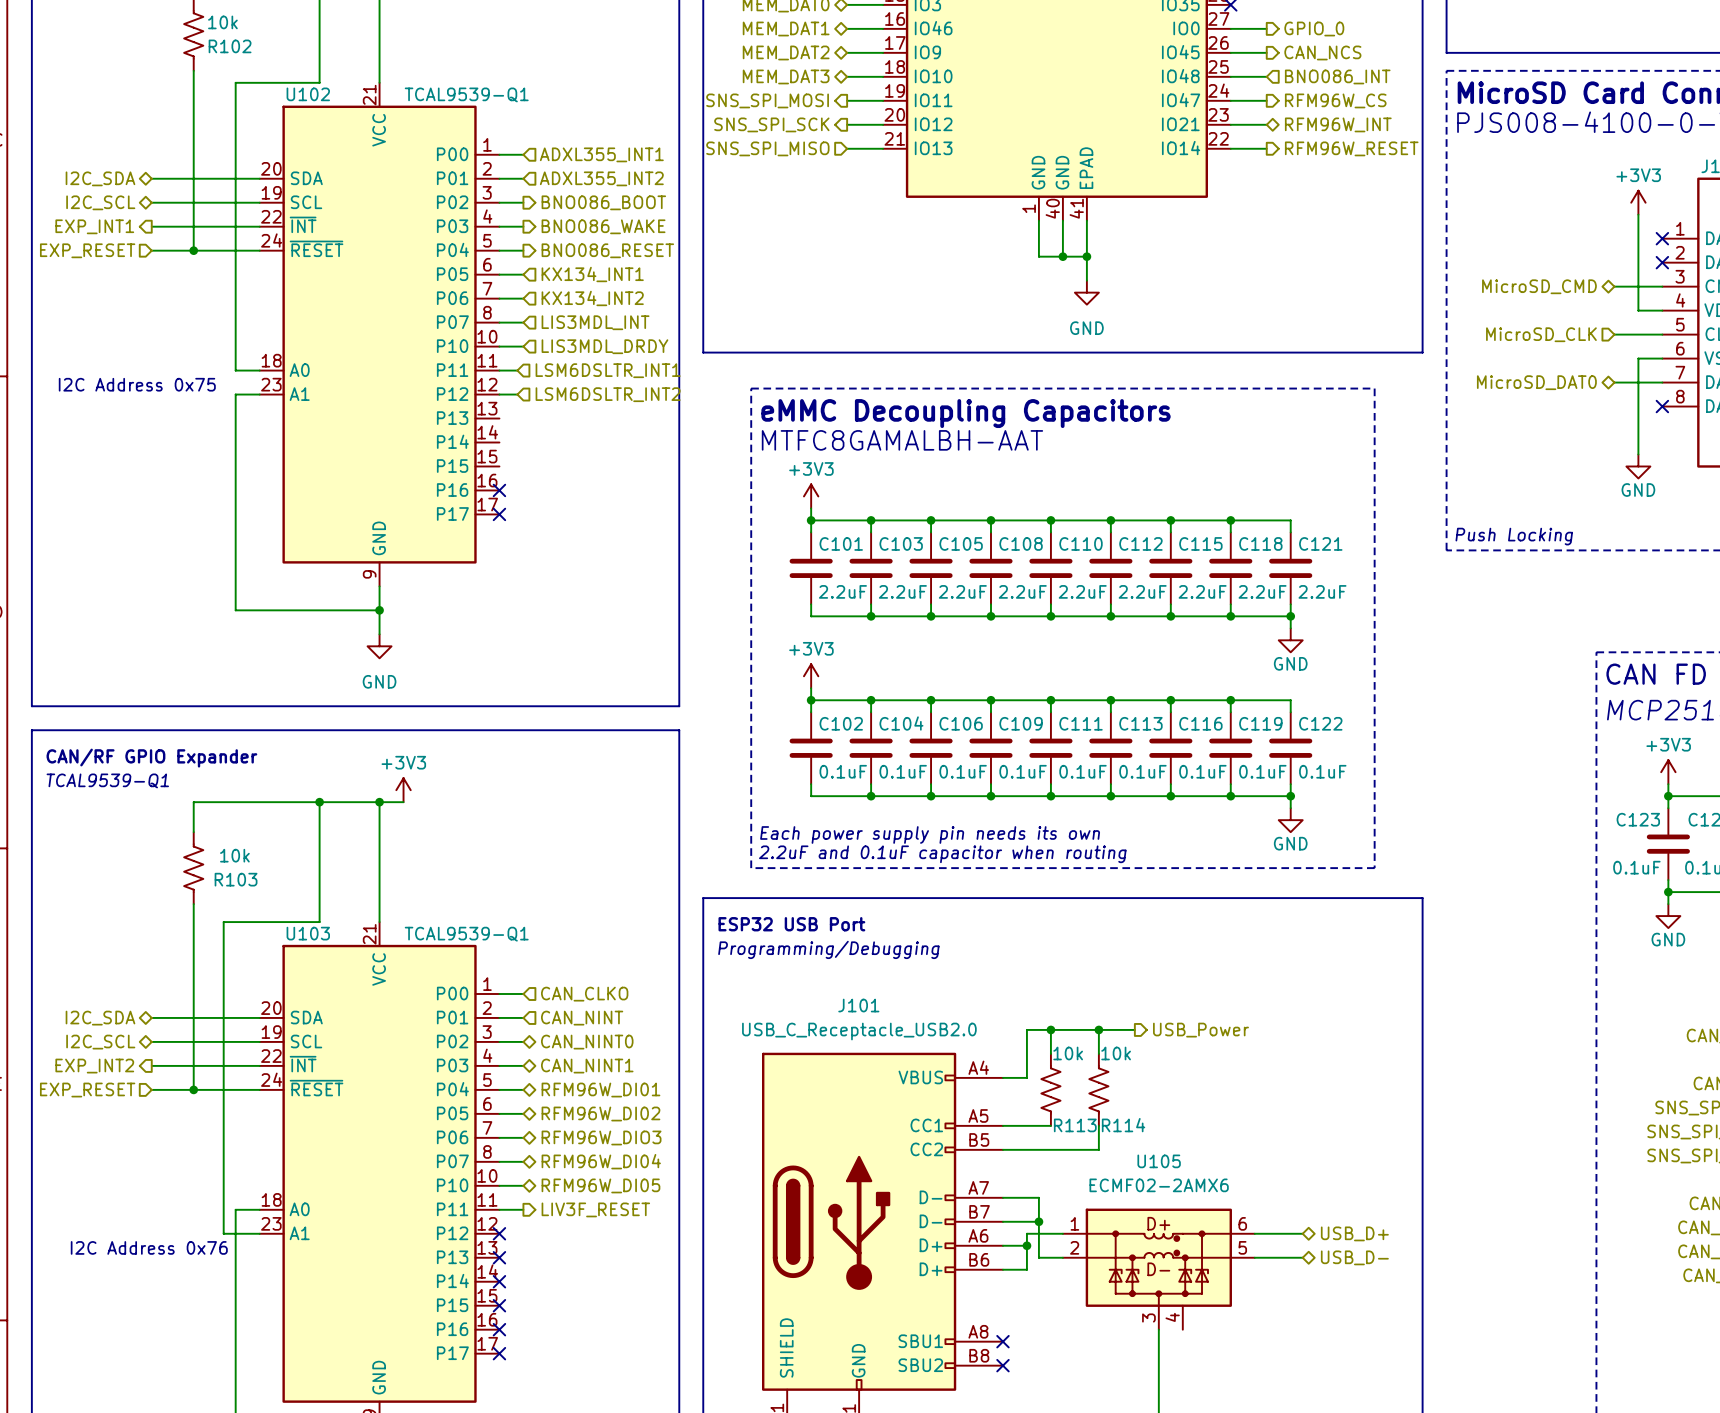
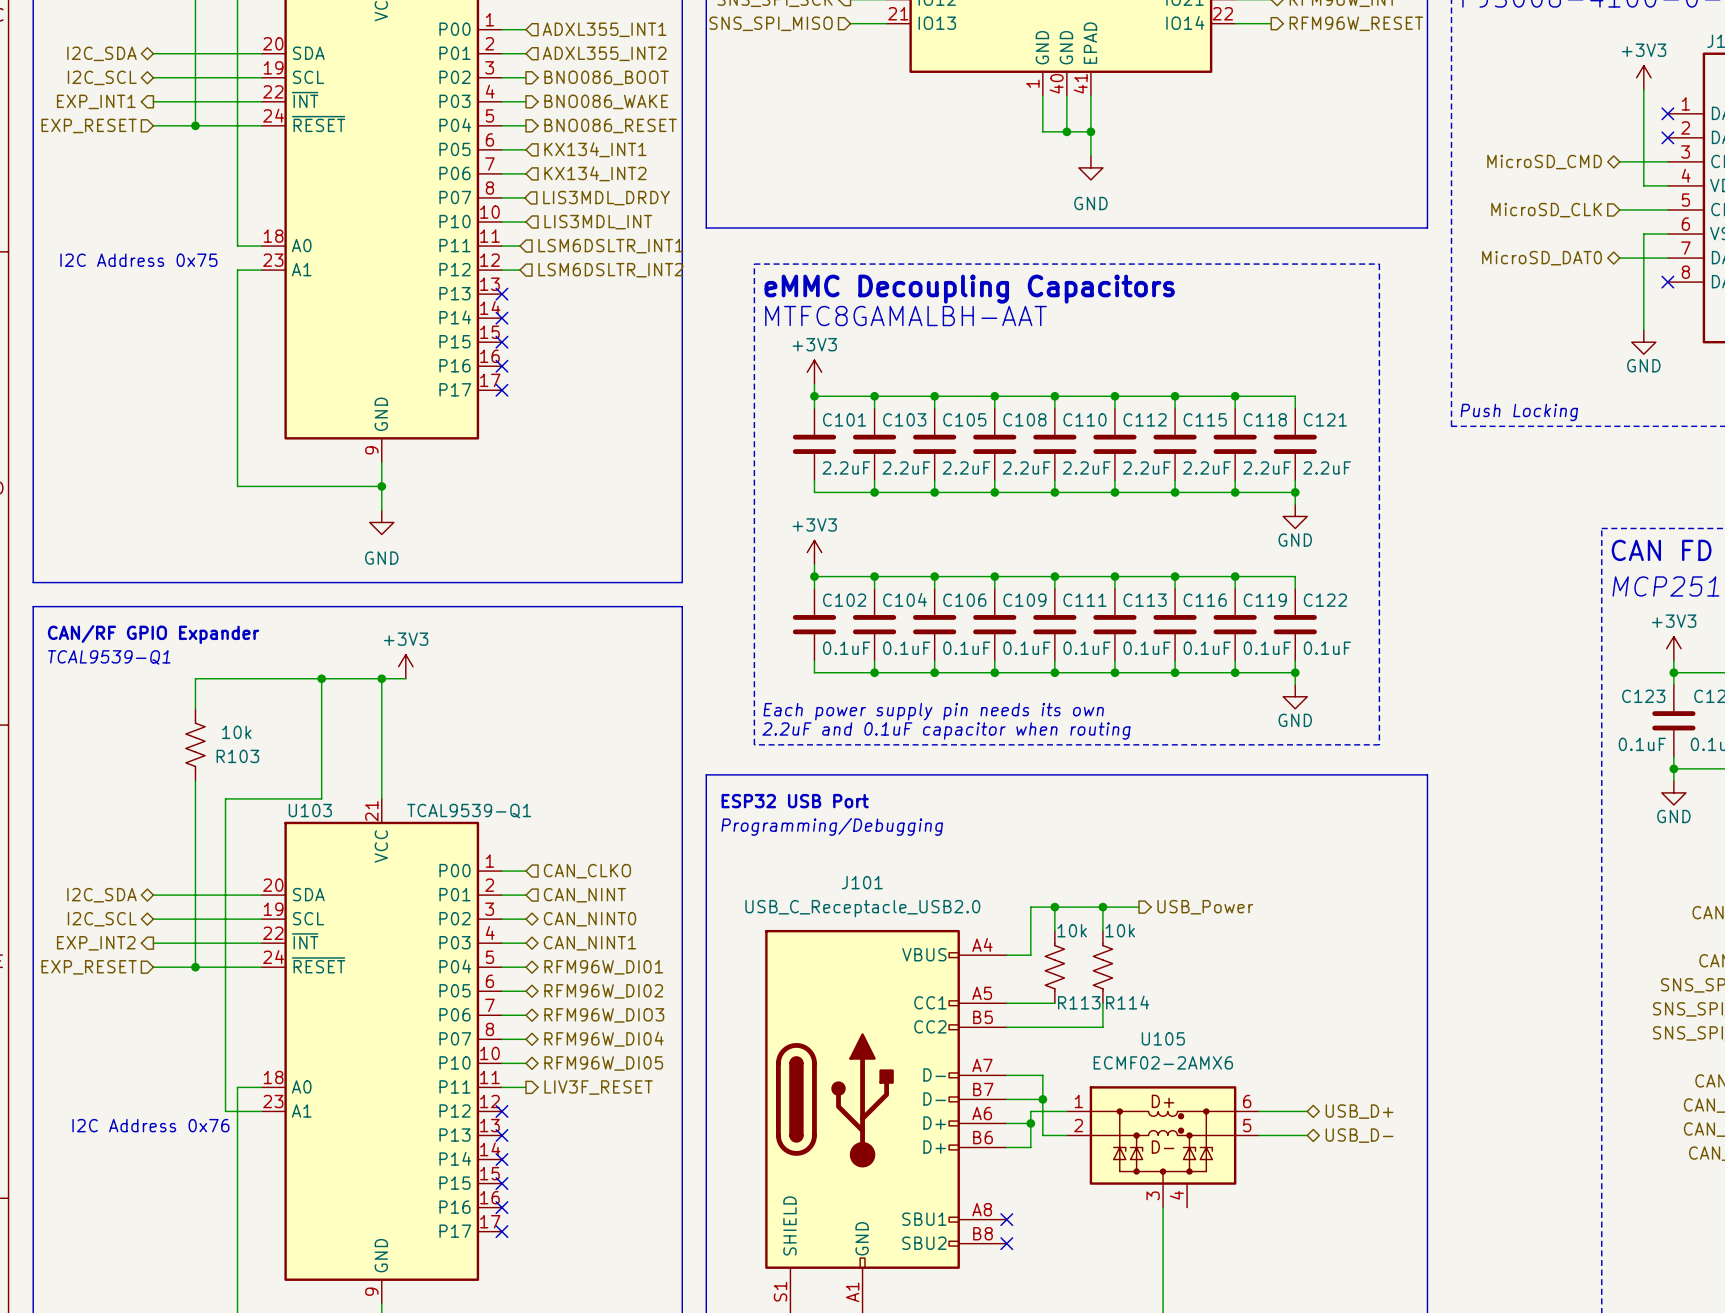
hierarchical label: LIS3MDL_INT (595, 322) -> LIS3MDL_DRDY (606, 198)
hierarchical label: LIS3MDL_DRDY (604, 346) -> LIS3MDL_INT (598, 222)
no-connect mark: none -> (501, 294)
no-connect mark: none -> (501, 318)
no-connect mark: none -> (501, 342)

